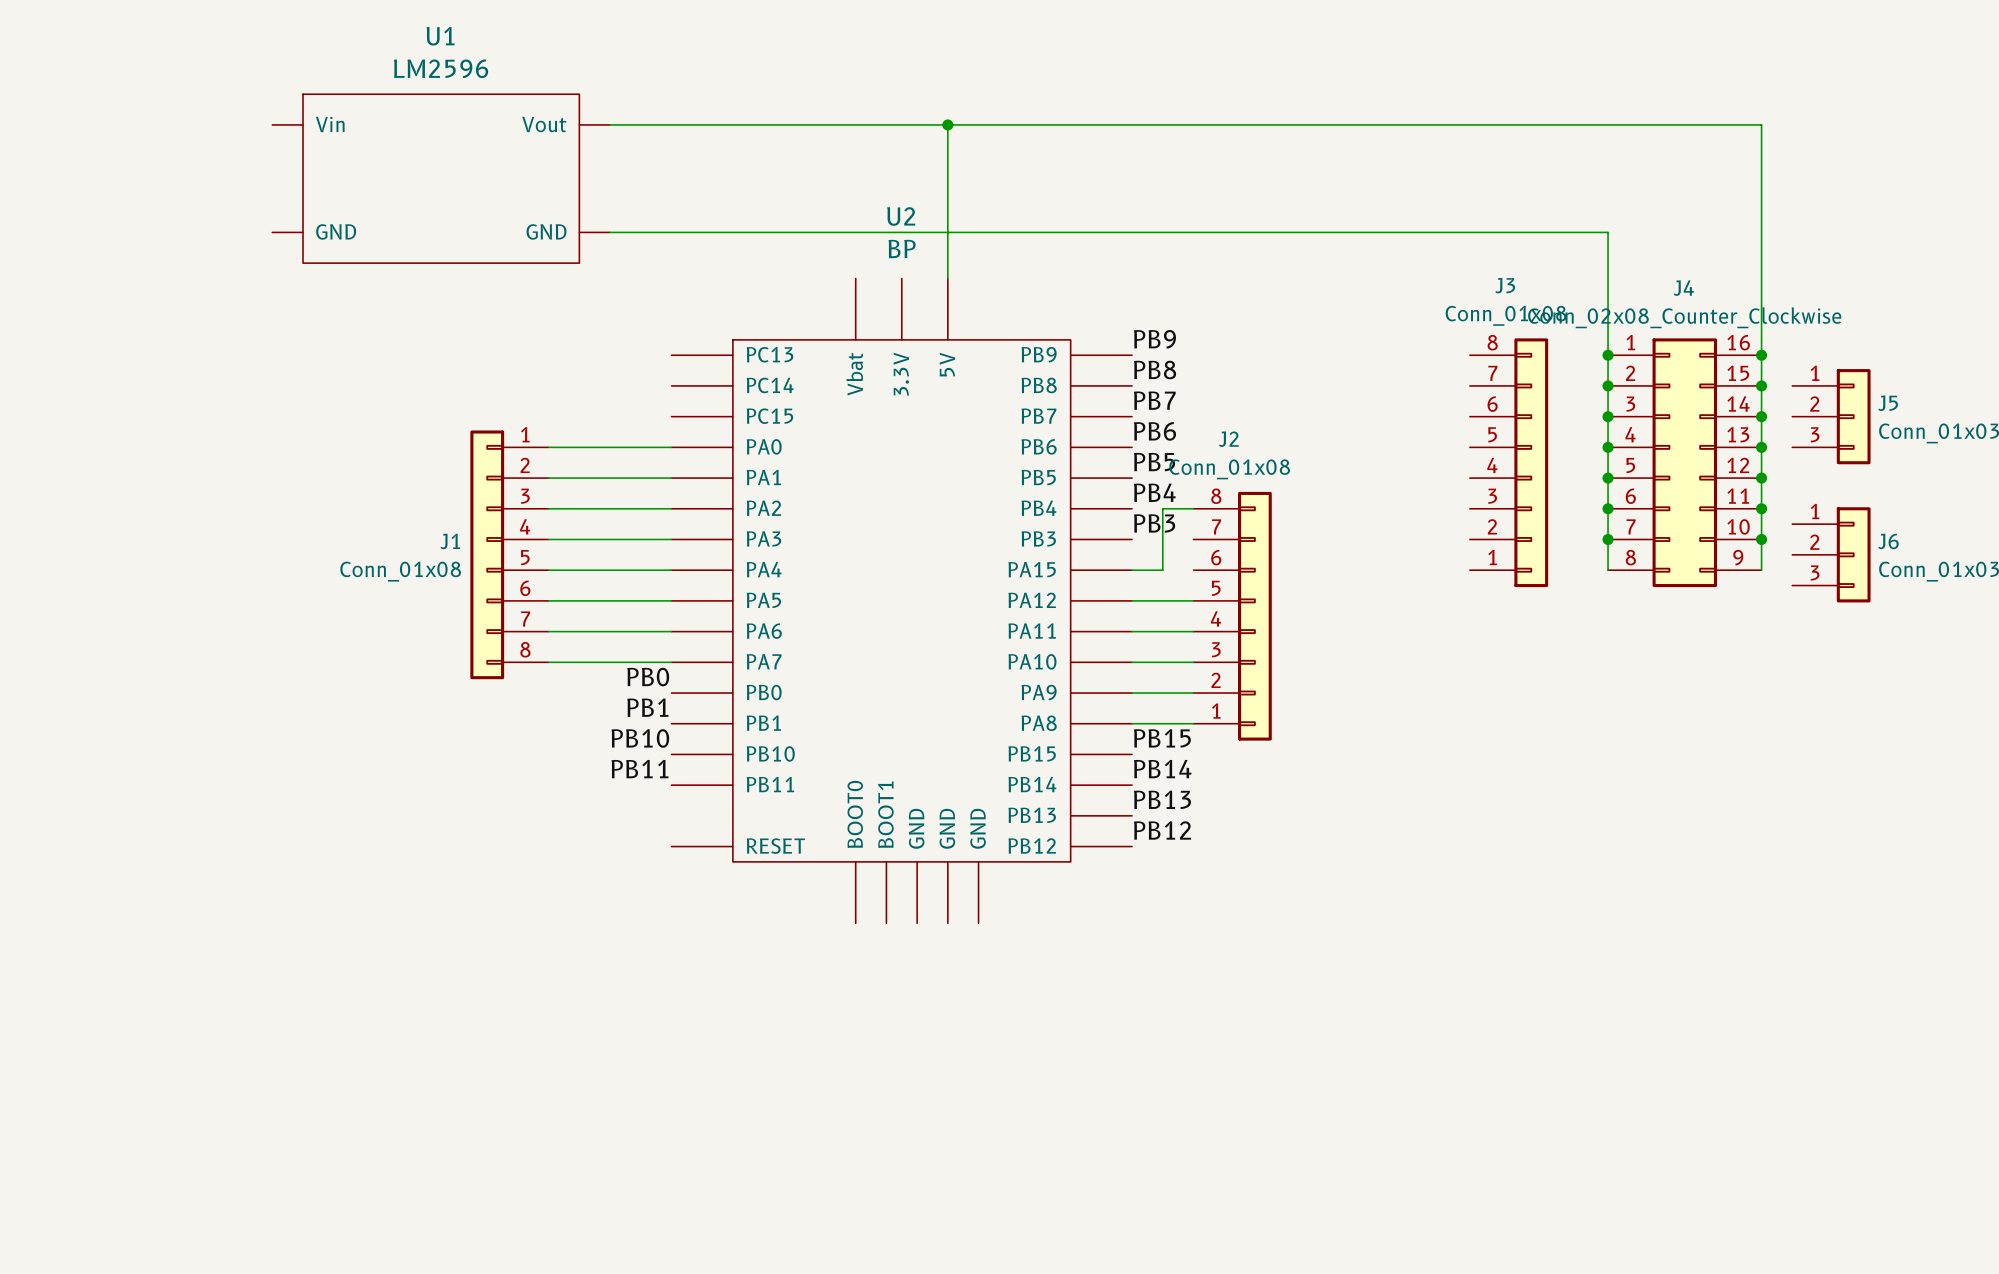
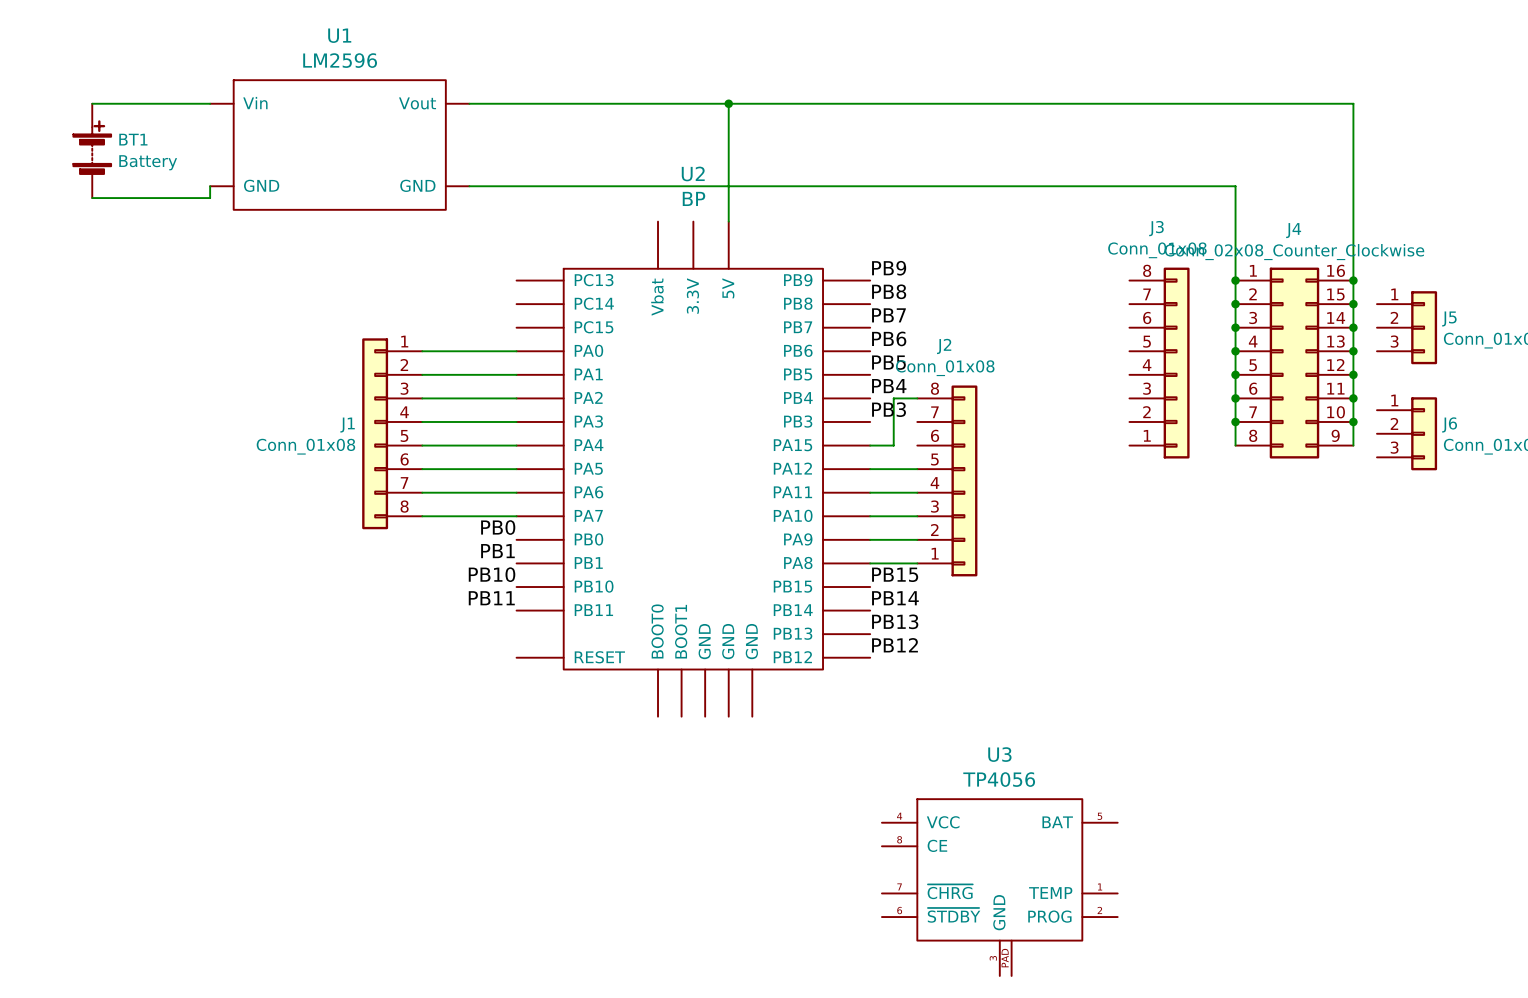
wire: none -> (92, 103) (210, 103)
BT1: none -> Battery (92, 150)
wire: none -> (210, 186) (210, 198) (92, 198)
U3: none -> TP4056 (999, 887)

